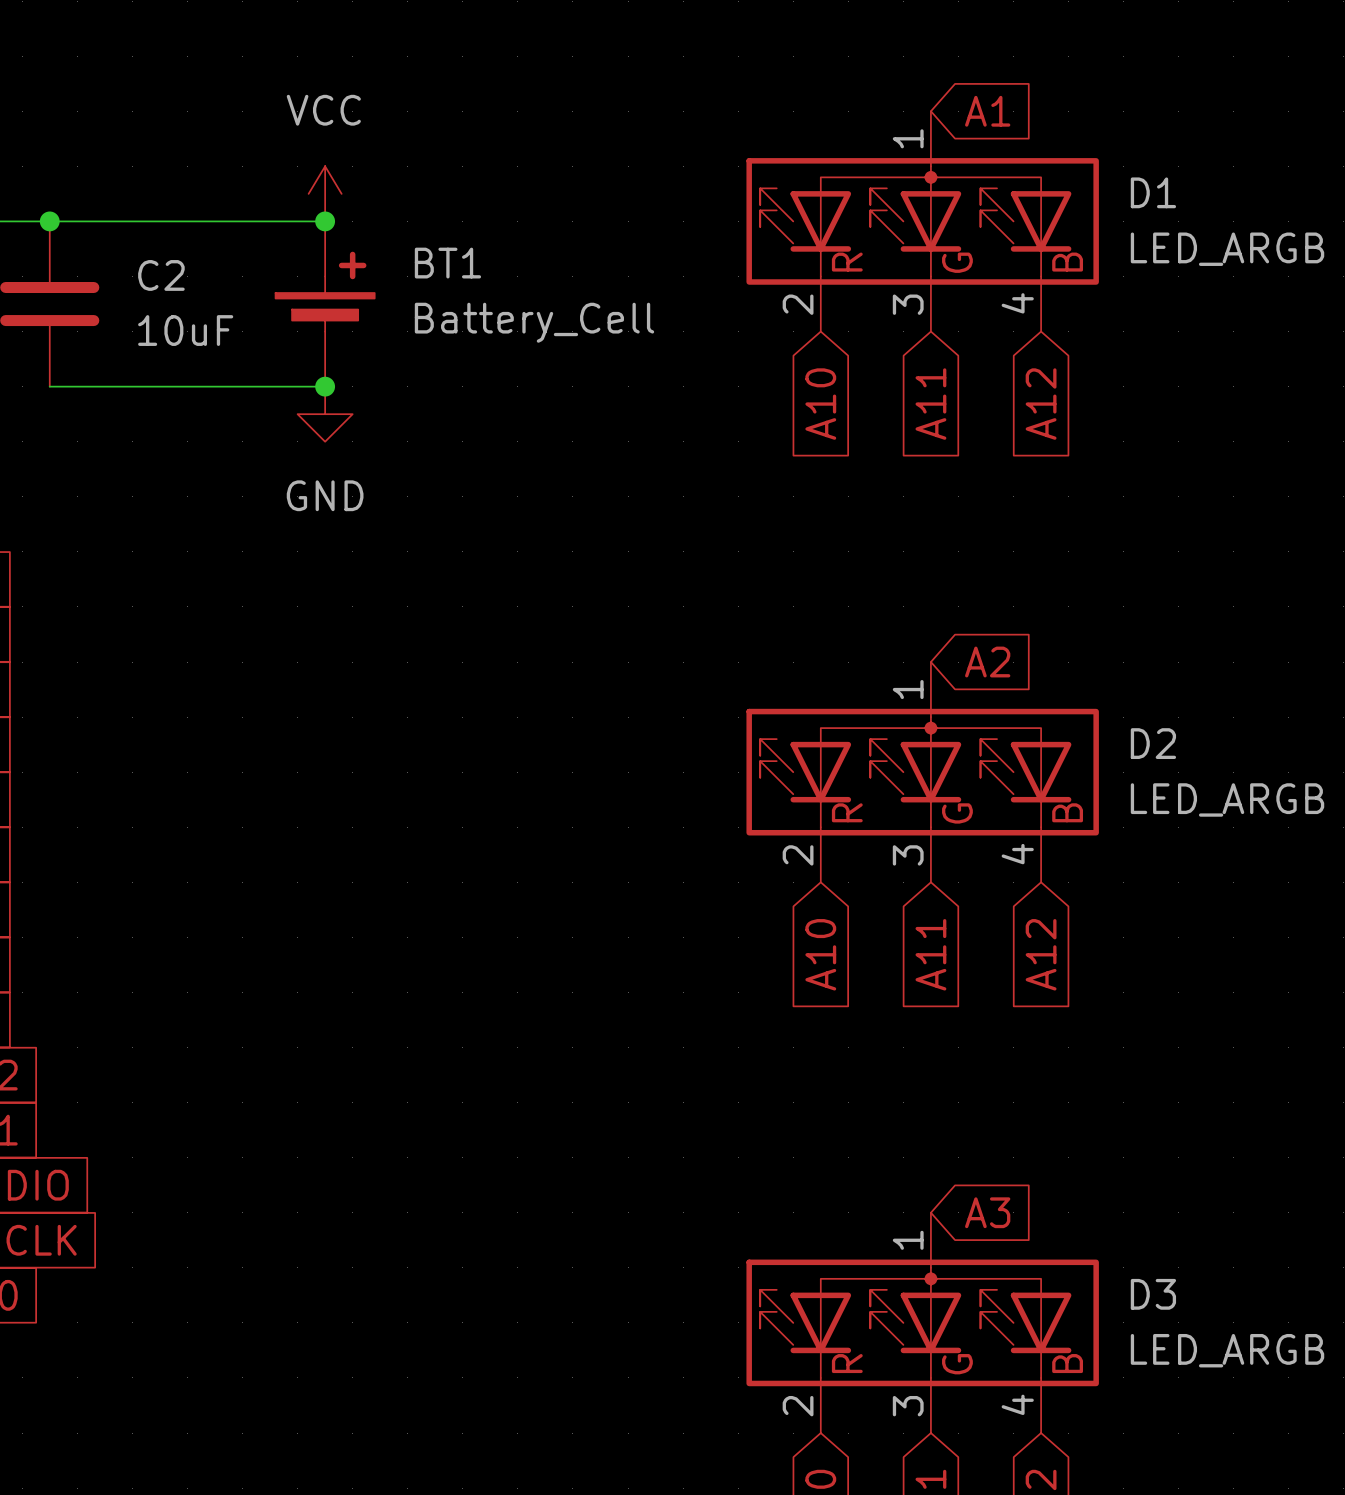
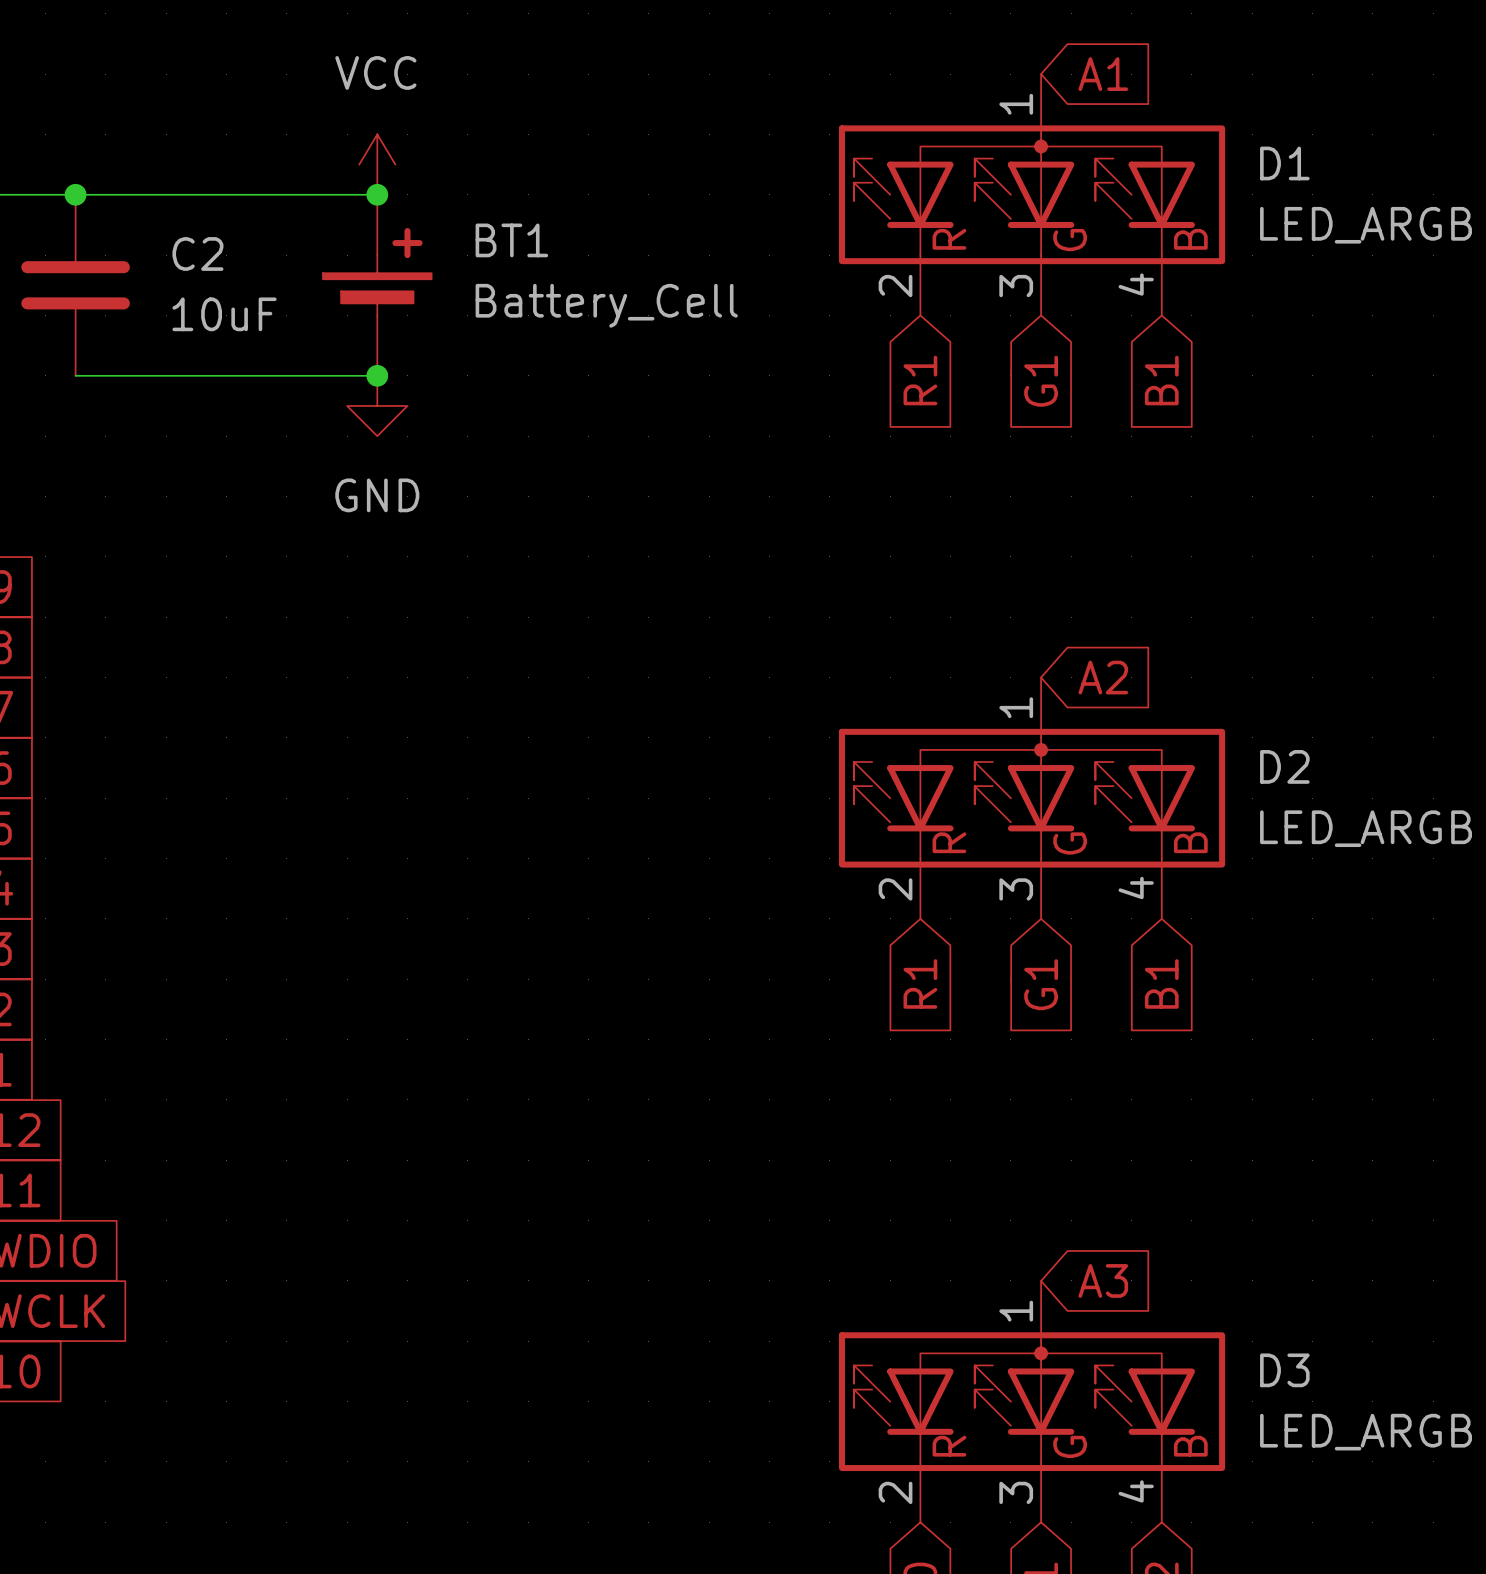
global label: A10 (820, 404) -> R1 (920, 380)
global label: A11 (930, 404) -> G1 (1041, 381)
global label: A12 (1041, 404) -> B1 (1161, 380)
global label: A10 (820, 954) -> R1 (920, 983)
global label: A11 (930, 954) -> G1 (1041, 984)
global label: A12 (1041, 954) -> B1 (1161, 983)

